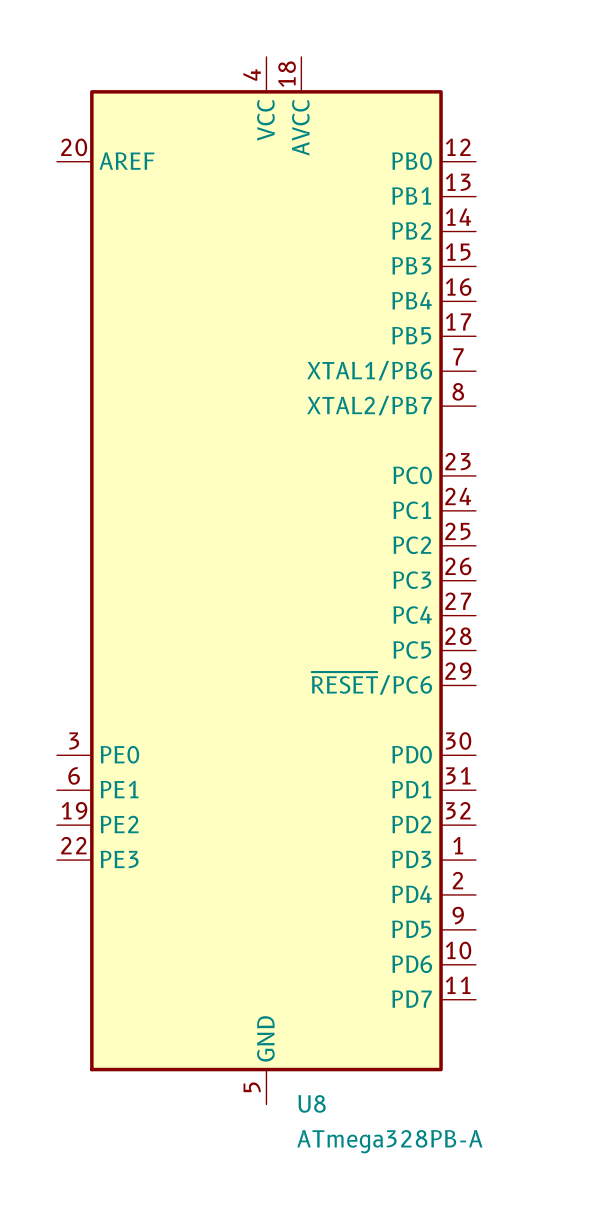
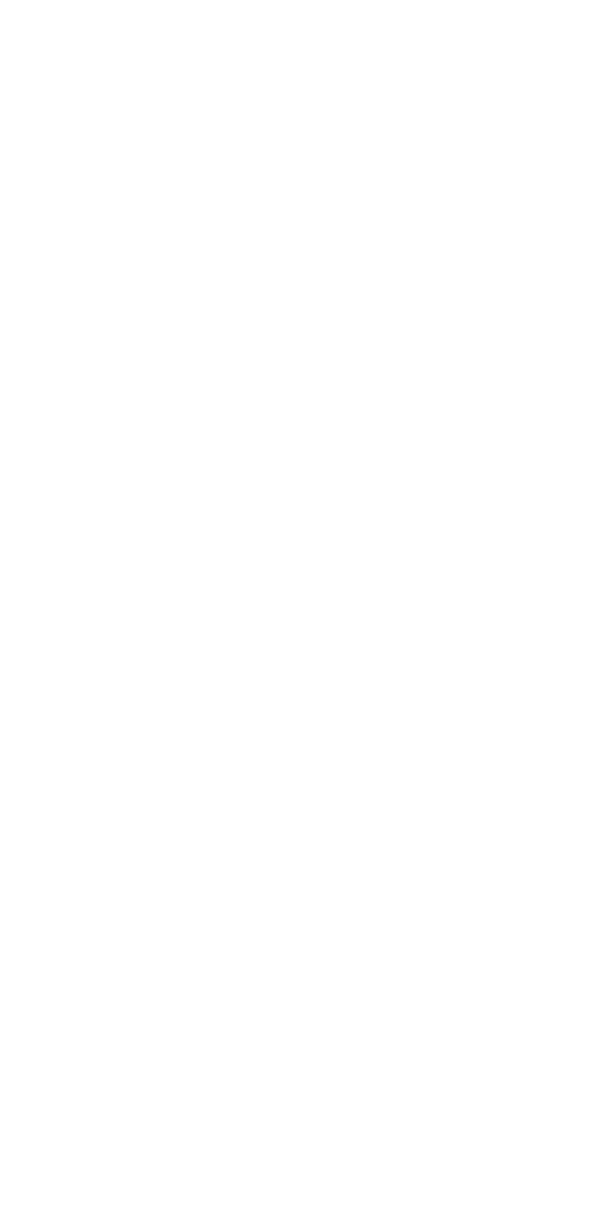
U8: ATmega328PB-A (266, 580) -> none

